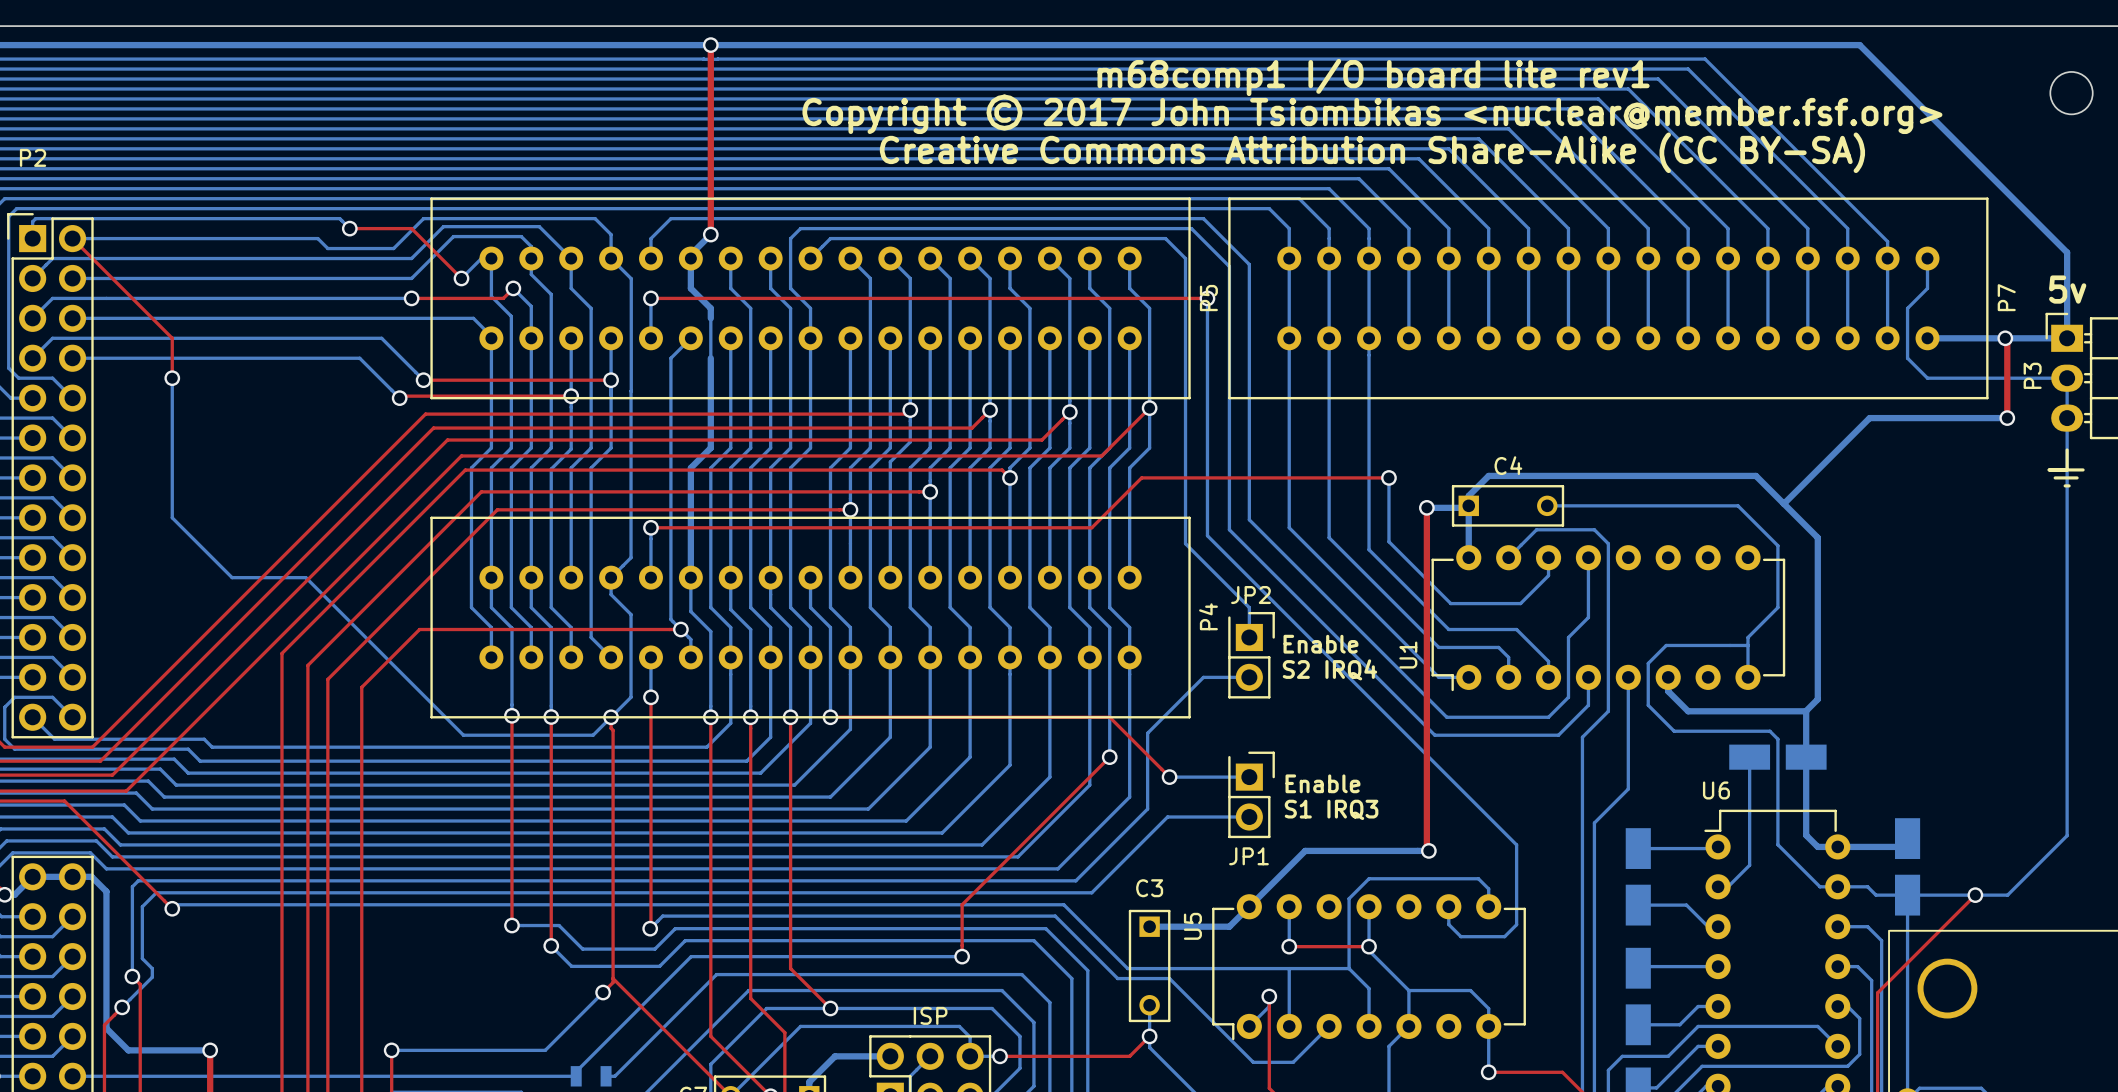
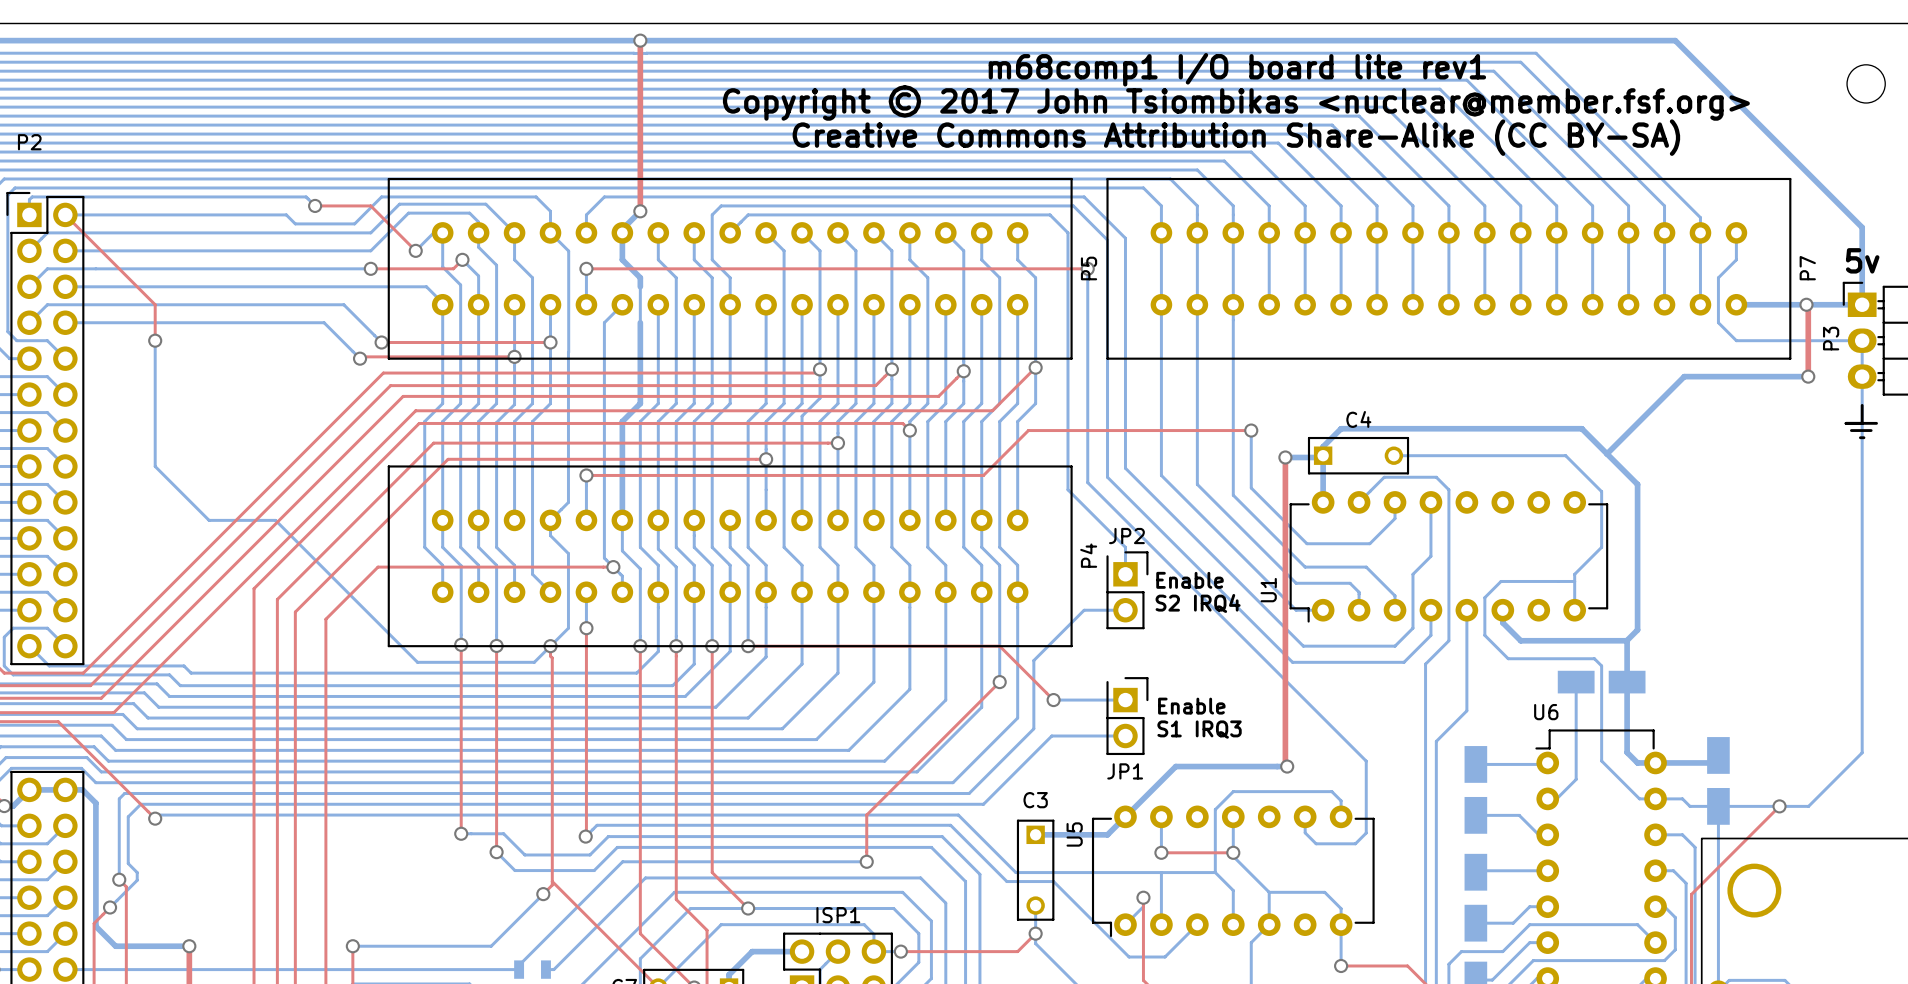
ISP name: ISP (930, 1015) -> ISP1 (838, 915)

